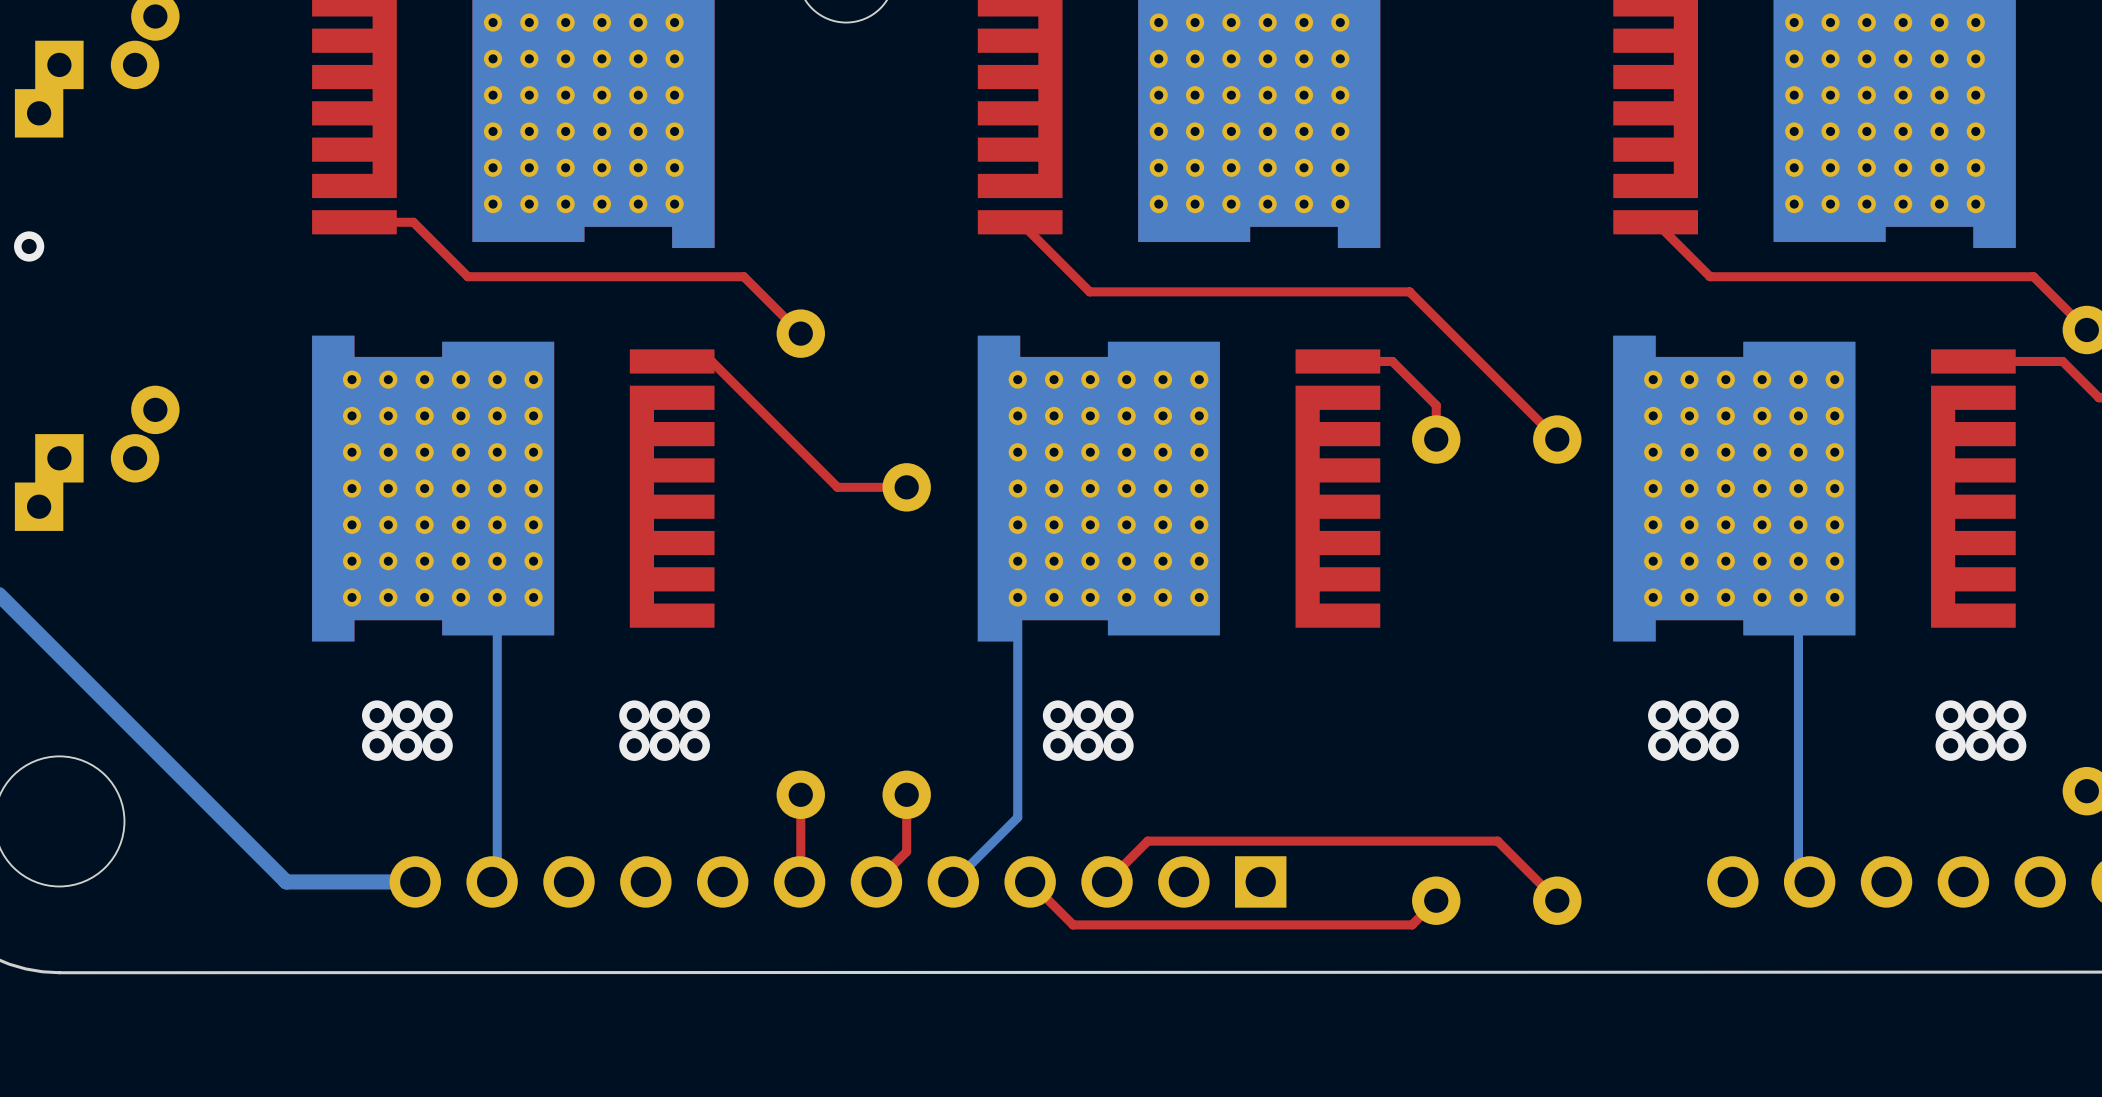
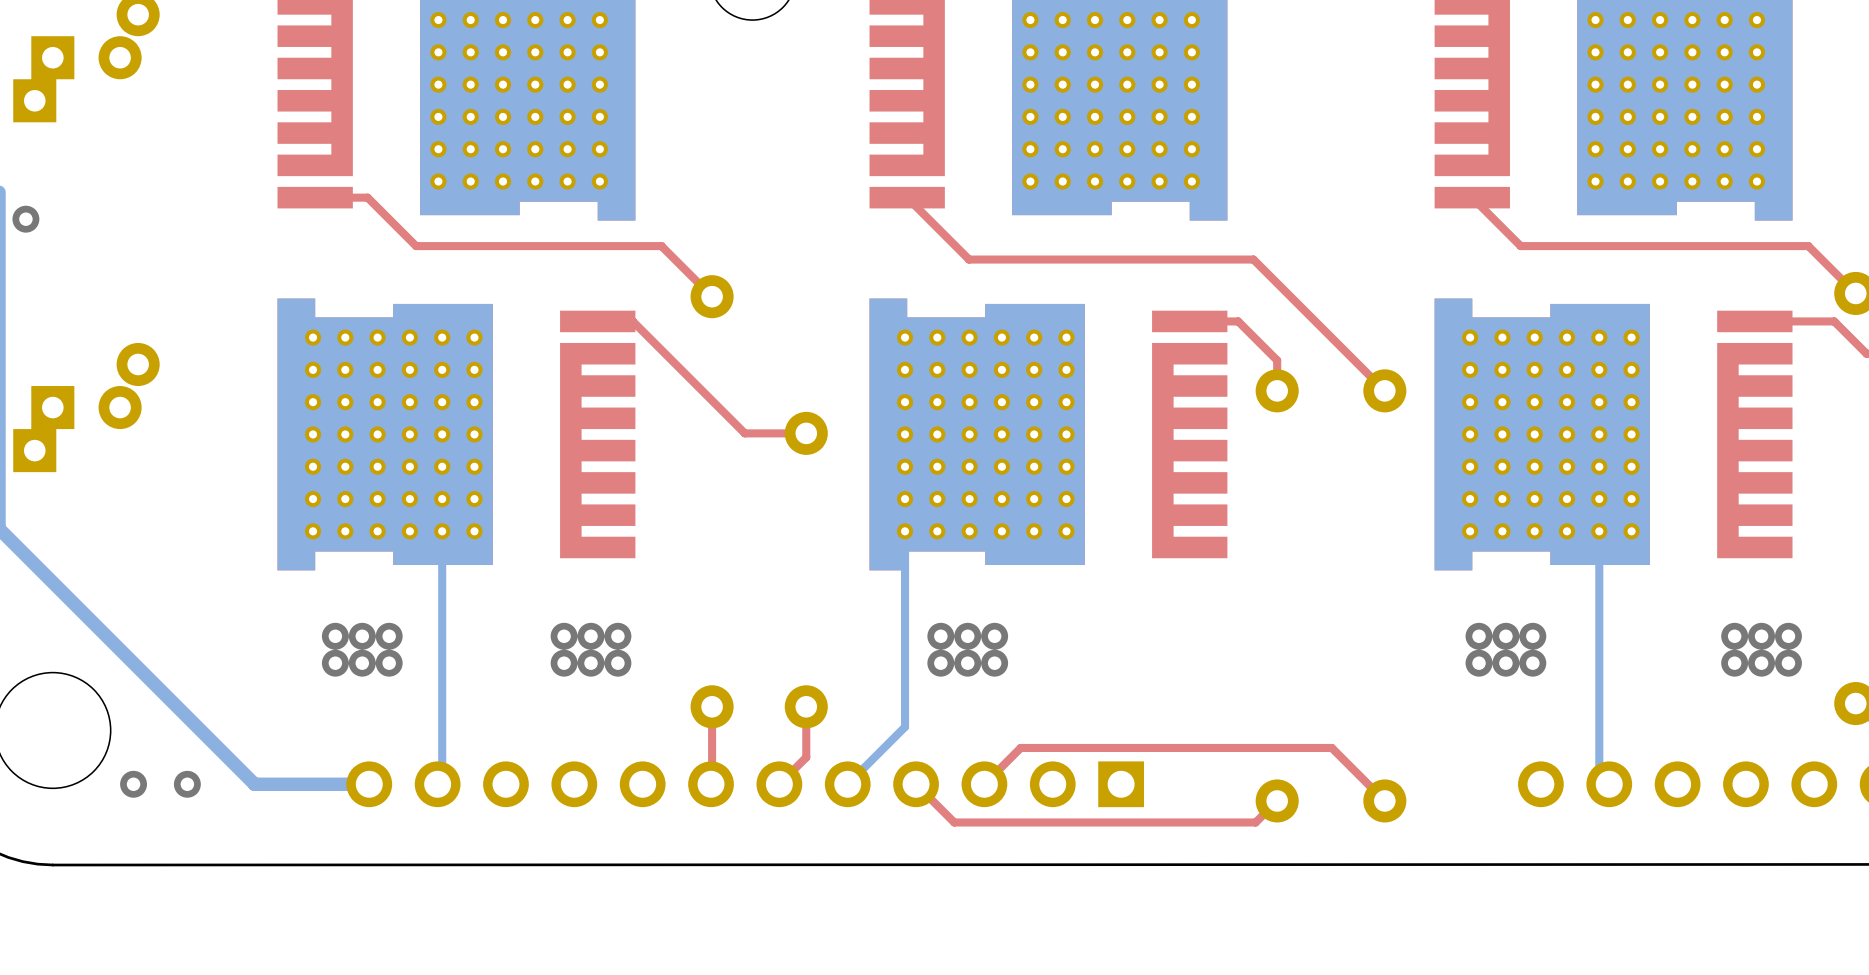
via: none -> (133, 784)
via: none -> (187, 784)

